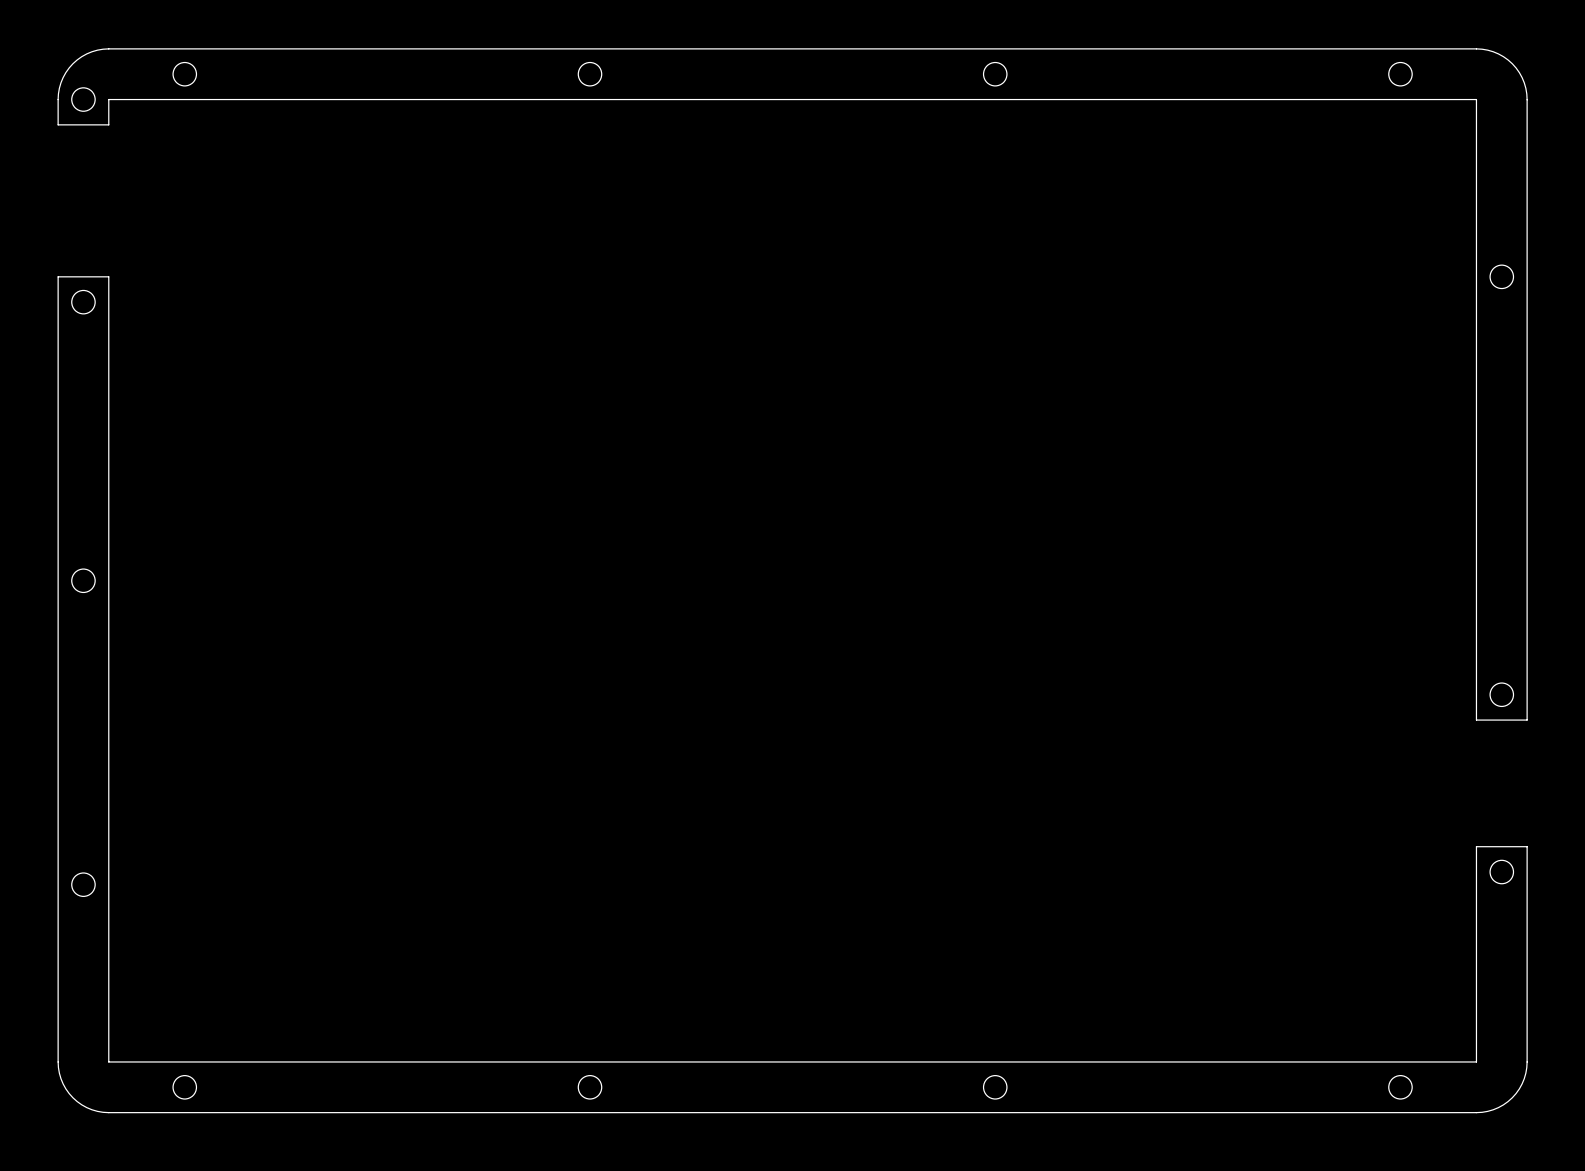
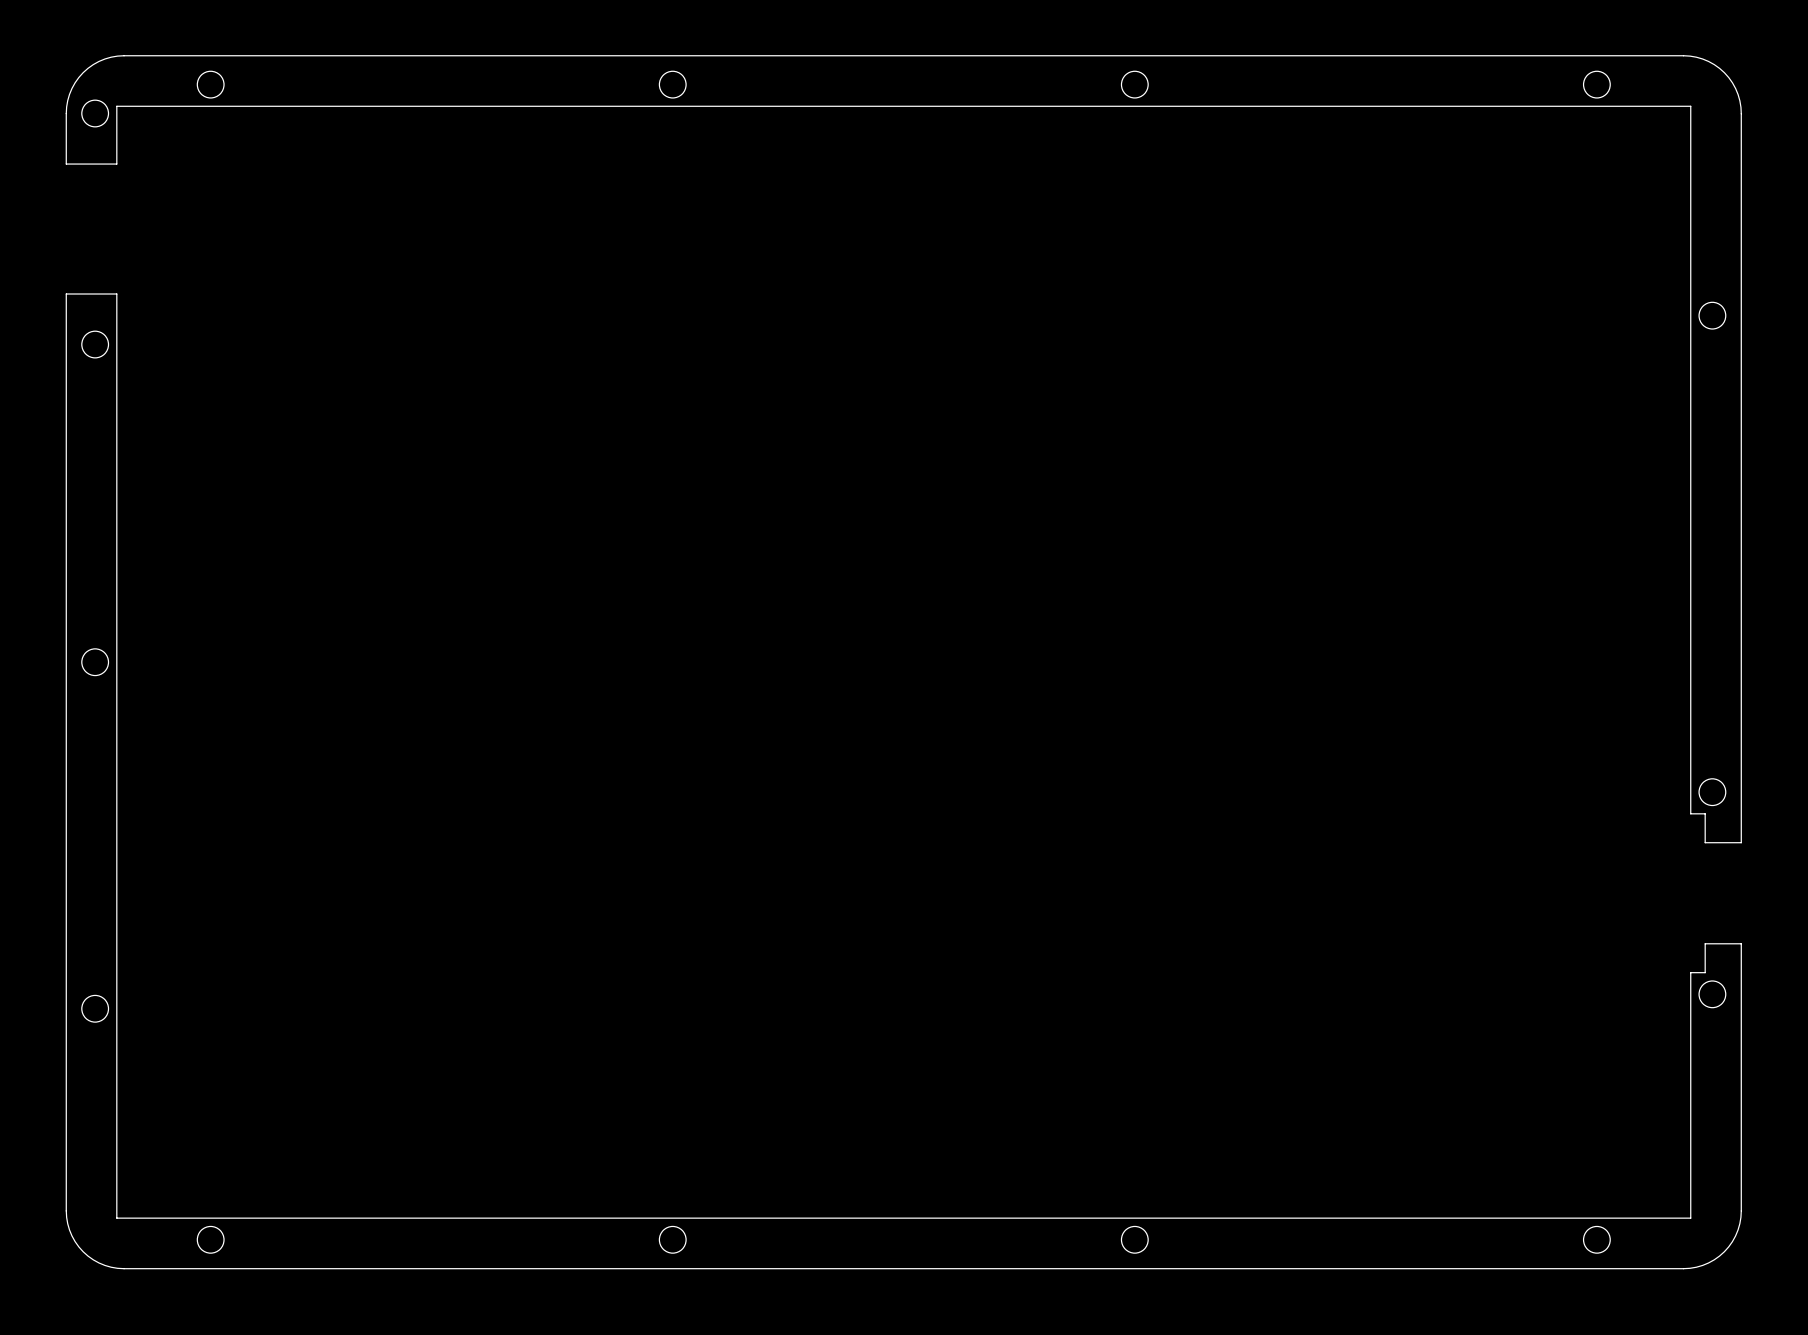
board edge: (58, 124) (108, 124) (108, 99) (1476, 99) (1476, 720) (1527, 720) -> (66, 142) (66, 164) (116, 164) (116, 106) (1690, 106) (1690, 813) (1705, 813) (1705, 842) (1741, 842) (1741, 821)
board edge: (58, 276) (108, 276) (108, 1061) (1476, 1061) (1476, 846) (1527, 846) -> (66, 315) (66, 294) (116, 294) (116, 1218) (1690, 1218) (1690, 972) (1705, 972) (1705, 943) (1741, 943) (1741, 965)

